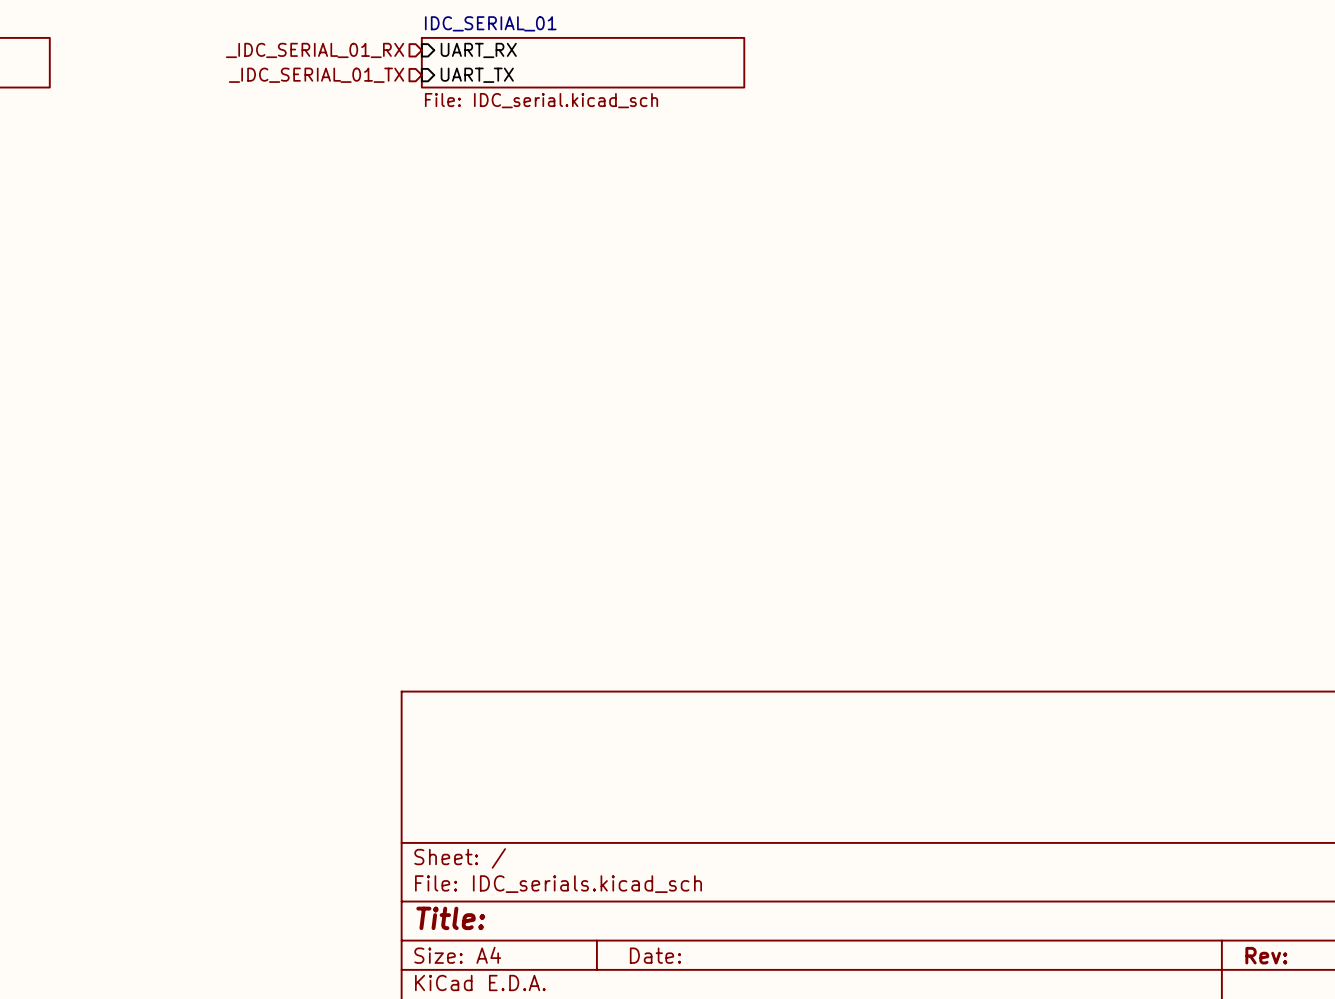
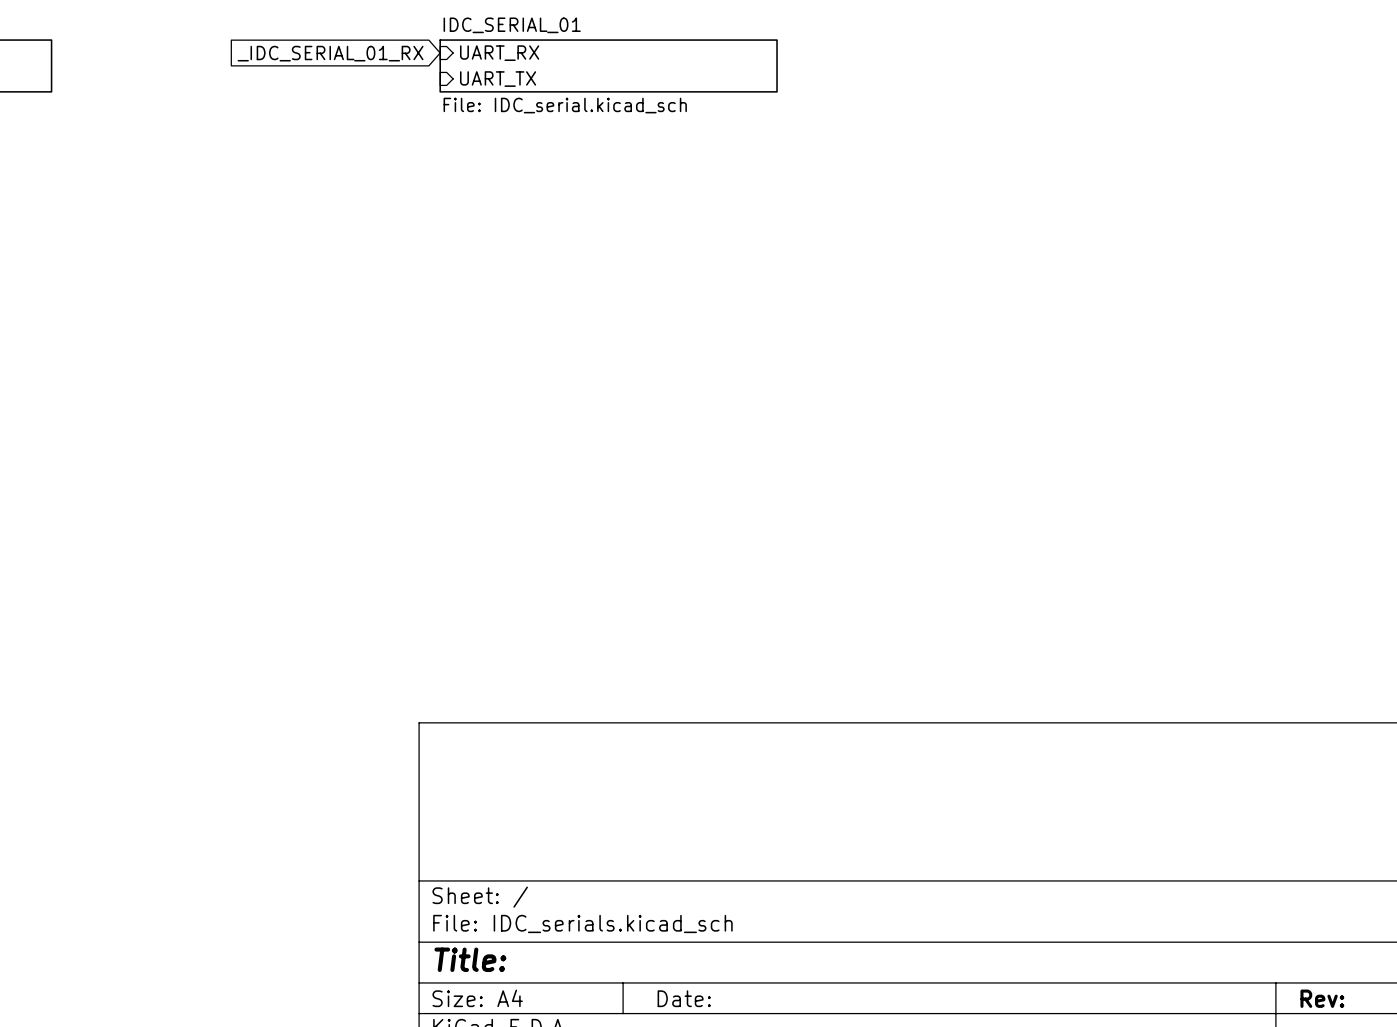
hierarchical label: _IDC_SERIAL_01_RX (315, 50) -> none
global label: none -> _IDC_SERIAL_01_RX (330, 53)
hierarchical label: _IDC_SERIAL_01_TX (316, 75) -> none

